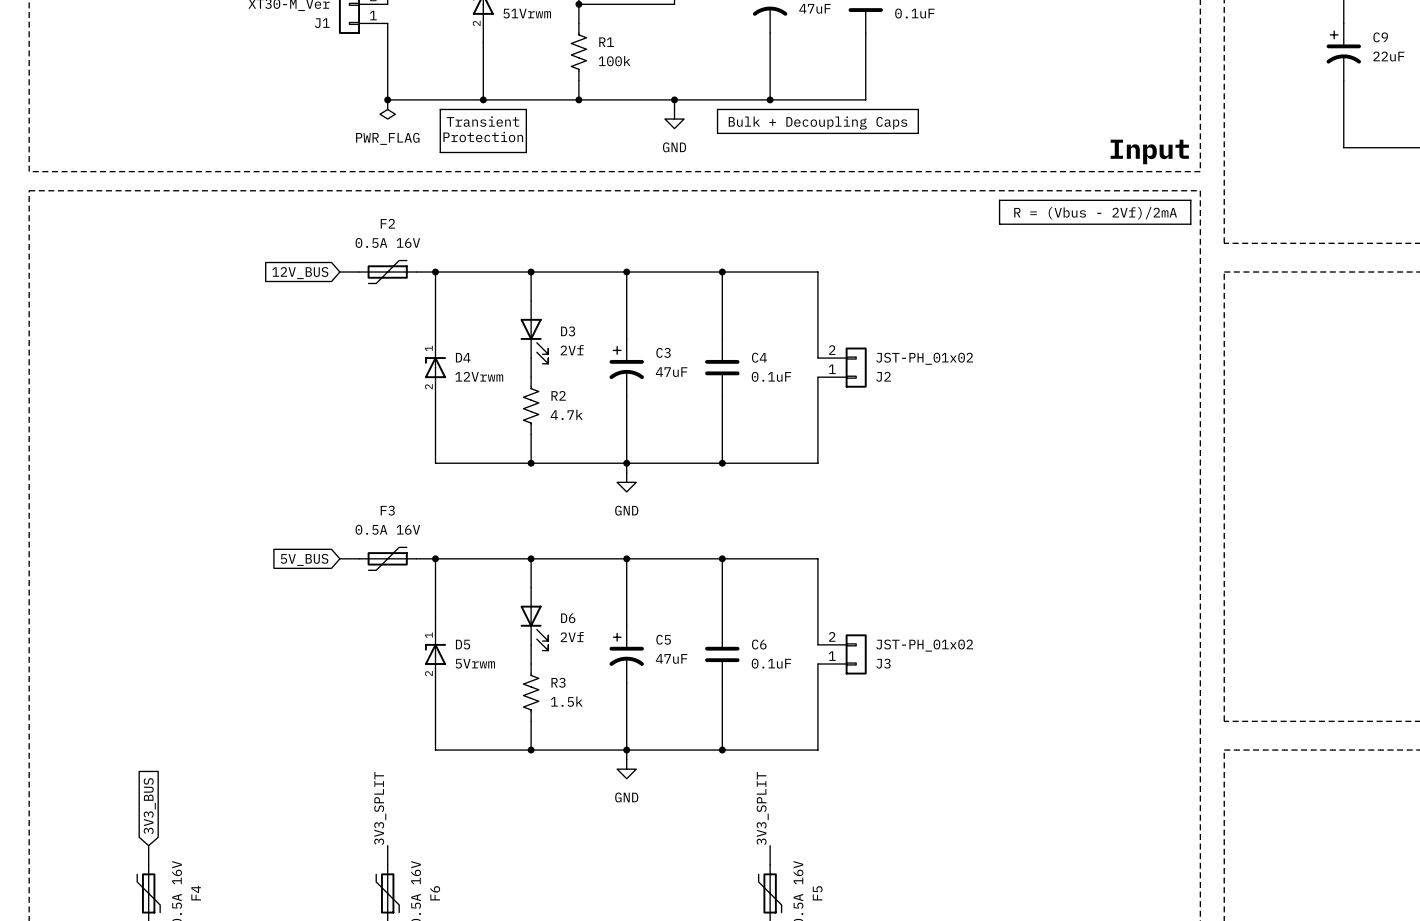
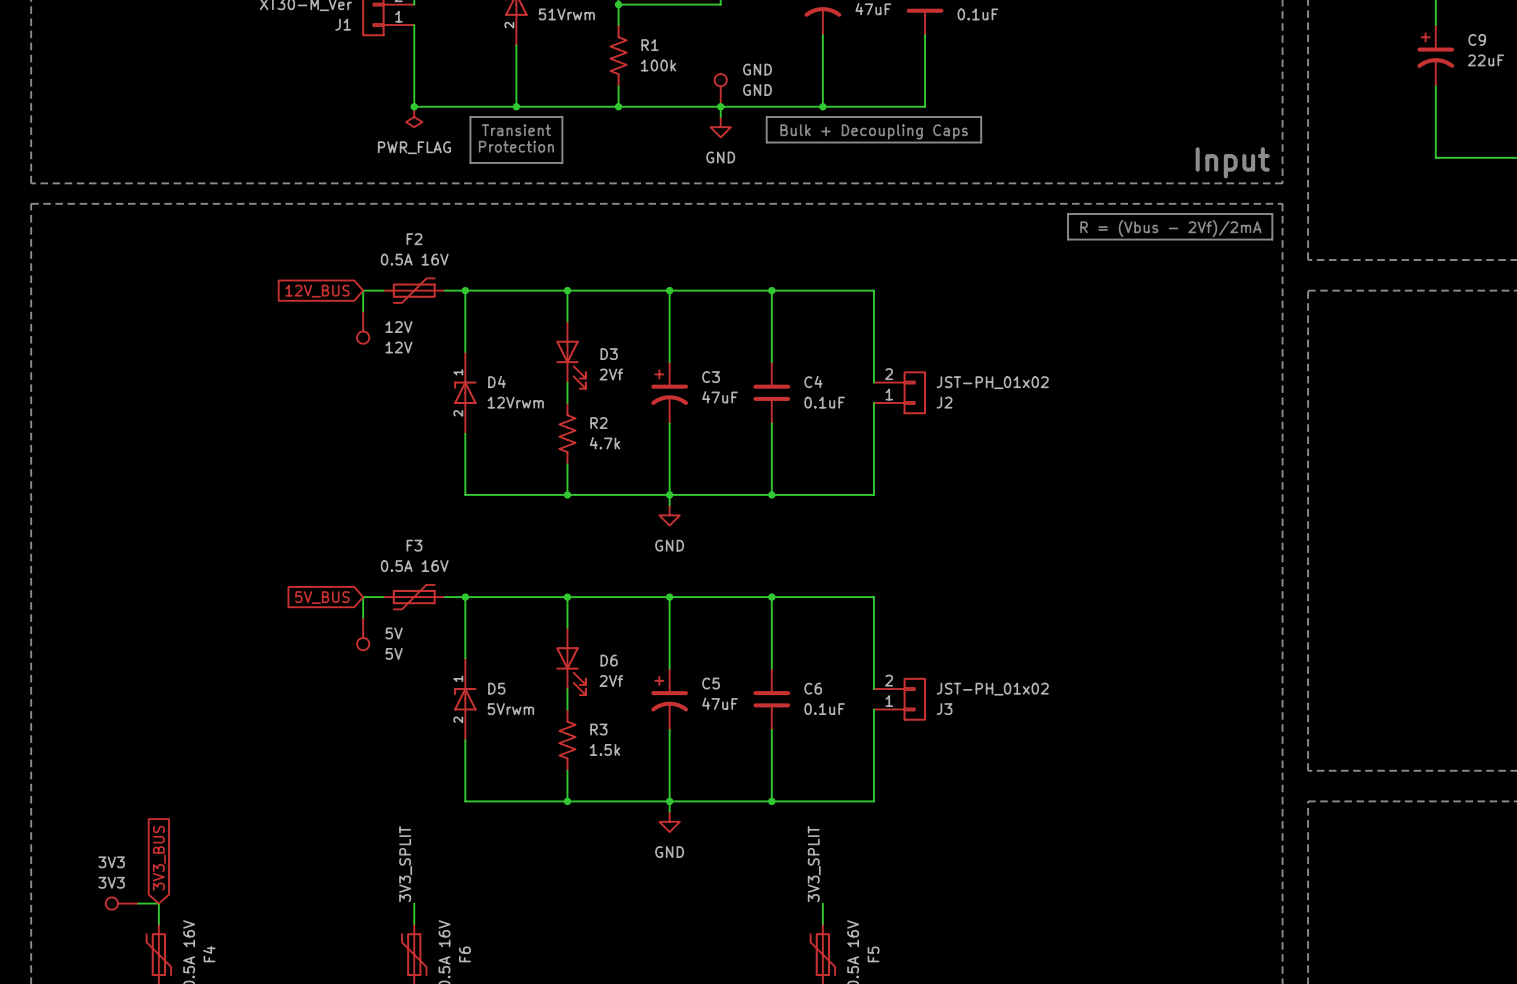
GND: none -> GND (720, 90)
wire: none -> (363, 290) (363, 311)
12V: none -> 12V (363, 327)
wire: none -> (363, 597) (363, 617)
5V: none -> 5V (363, 633)
3V3: none -> 3V3 (122, 903)
wire: none -> (138, 903) (158, 903)

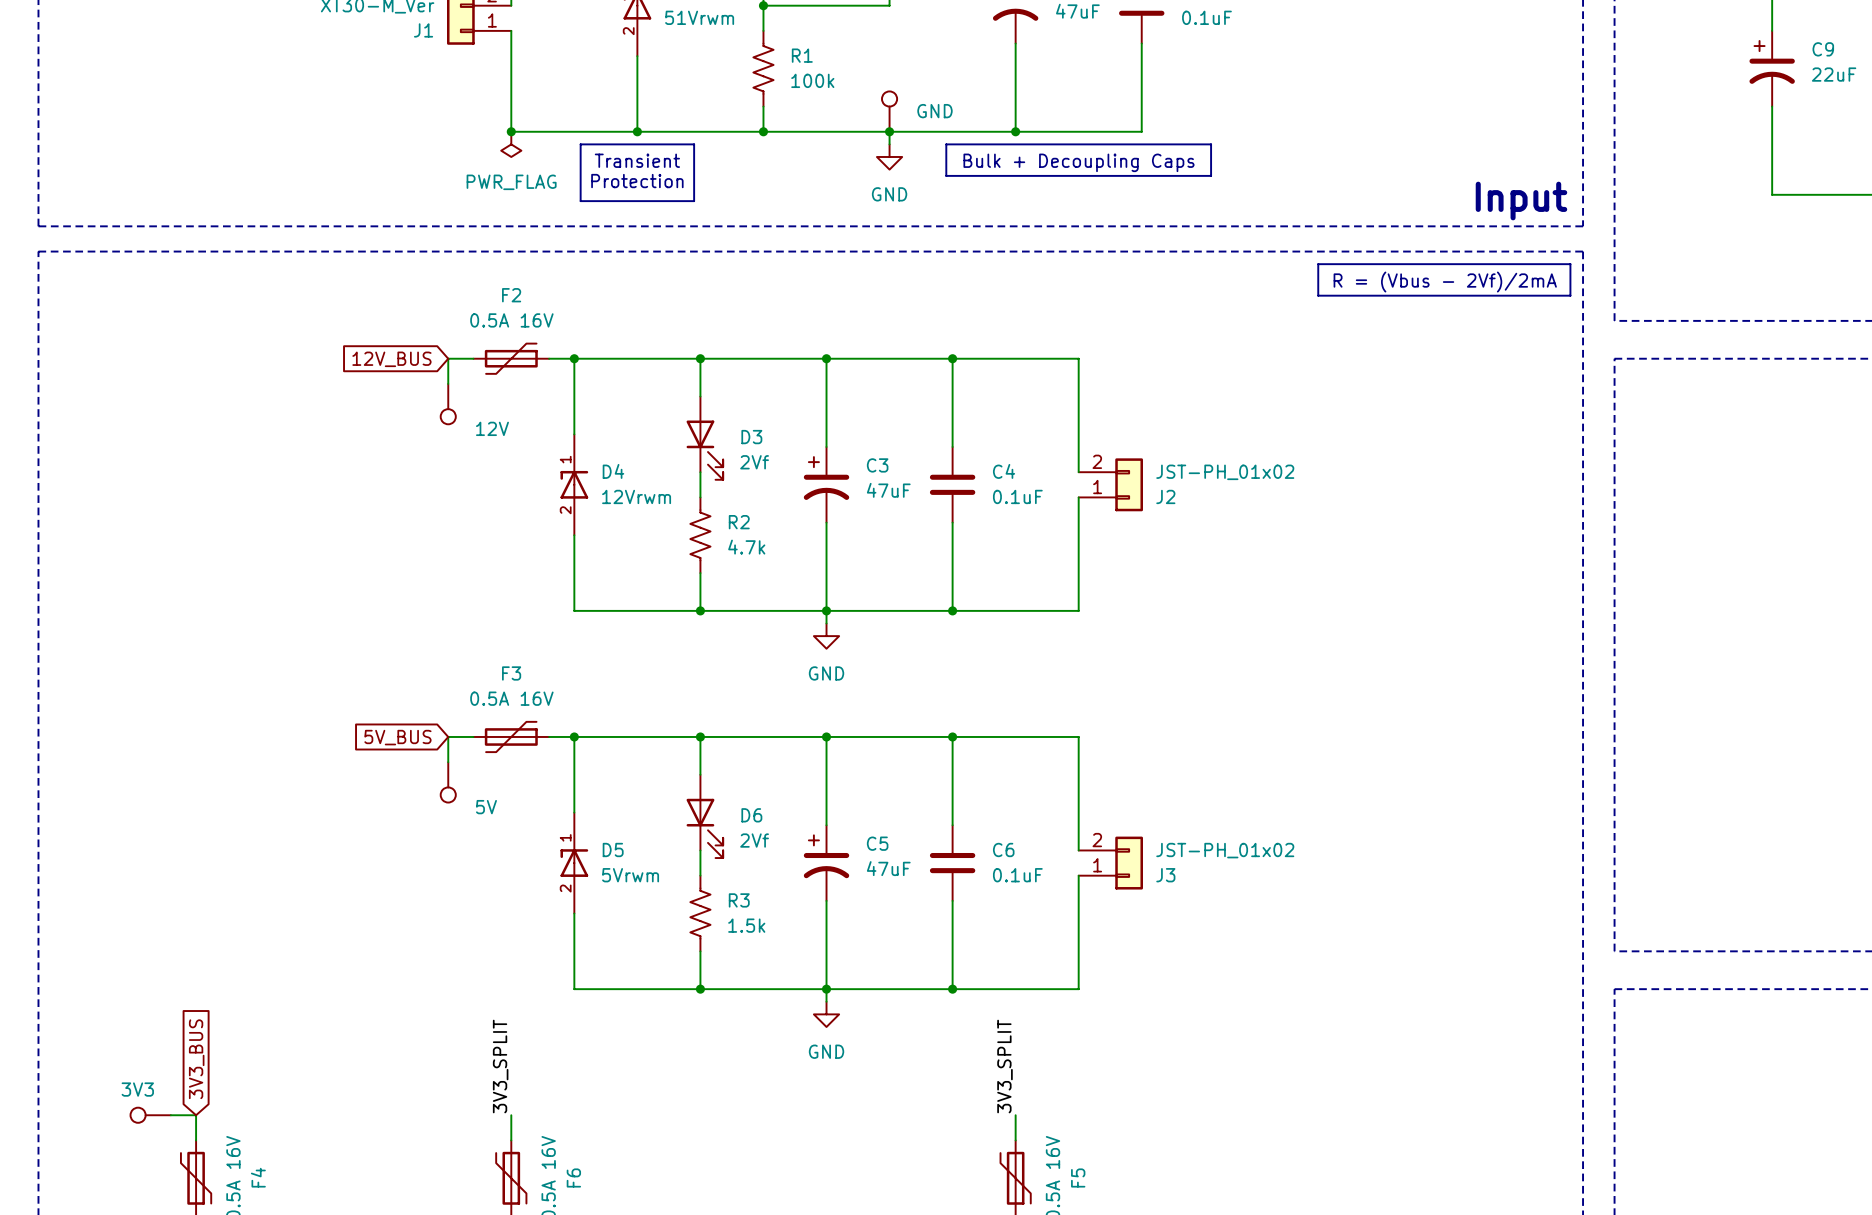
GND name: GND (757, 69) -> none
12V name: 12V (399, 327) -> none
5V name: 5V (394, 633) -> none
3V3 name: 3V3 (111, 862) -> none

